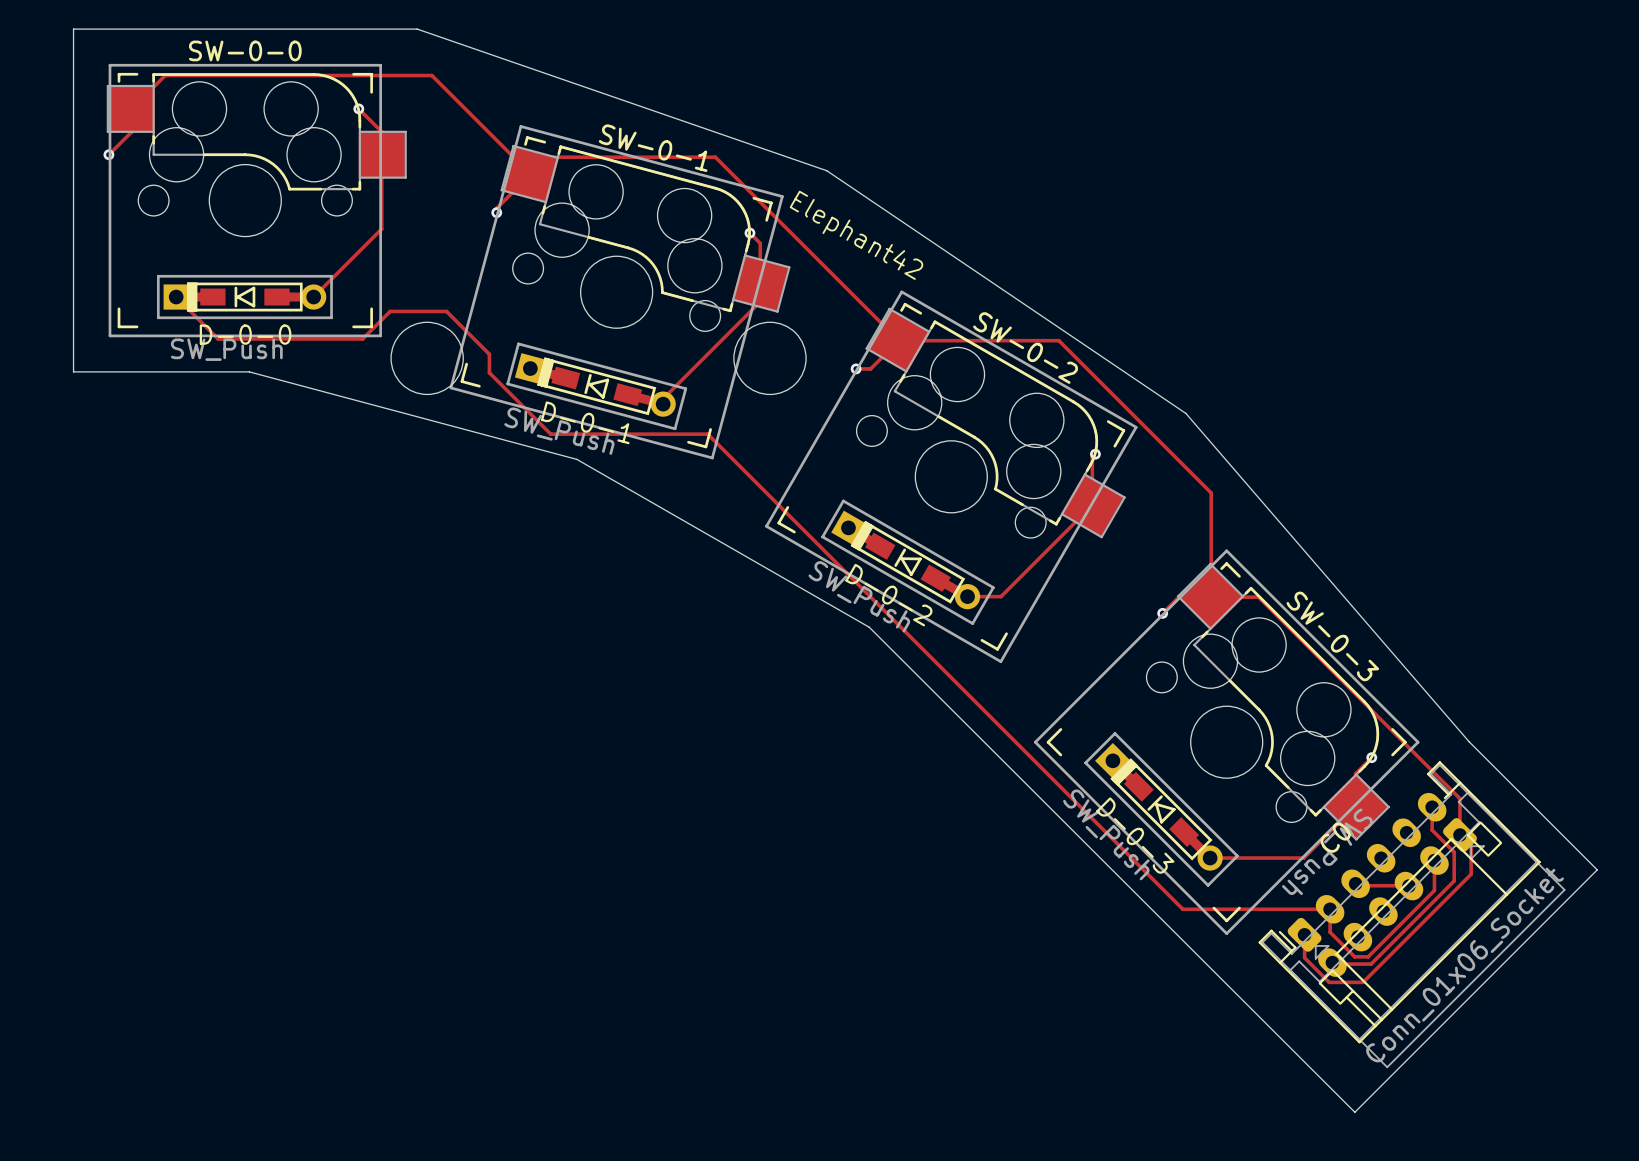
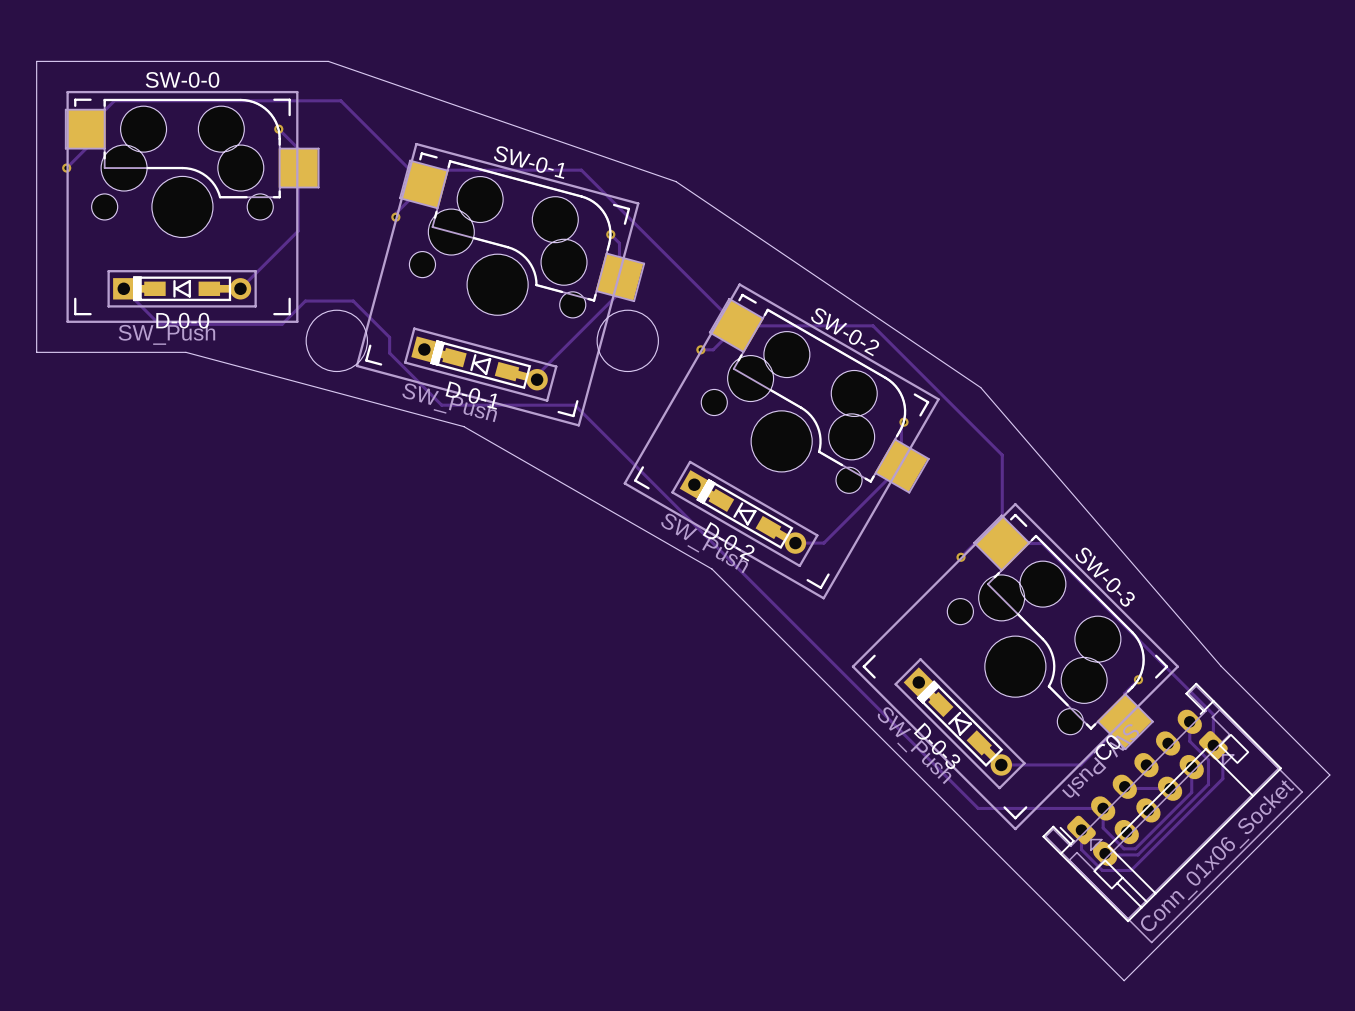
text: Elephant42 (856, 235) -> none

